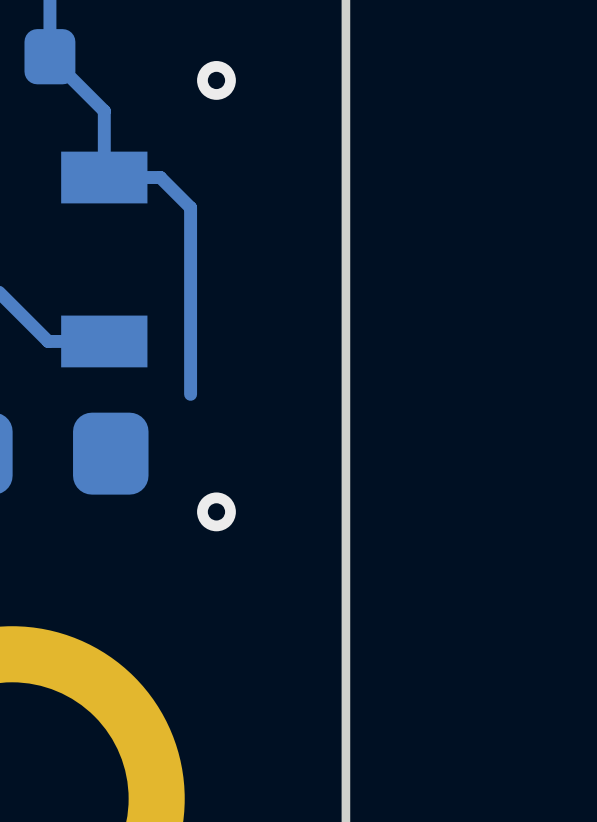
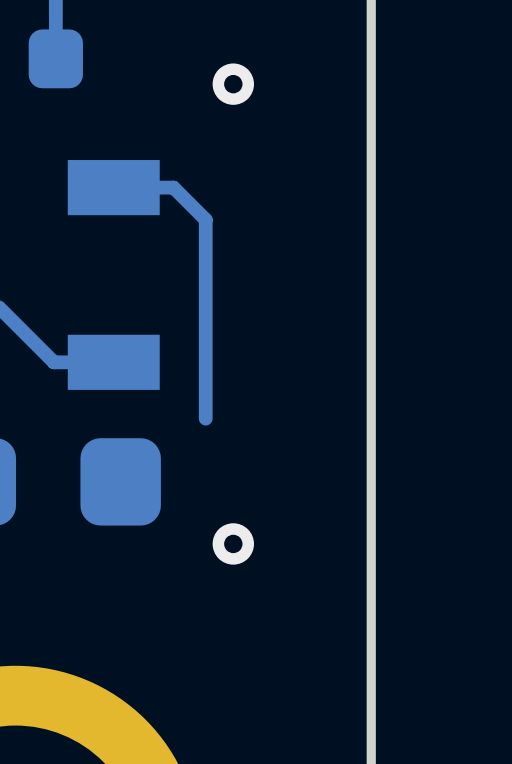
bottom track: (49, 56) (104, 111) (104, 177) -> none

